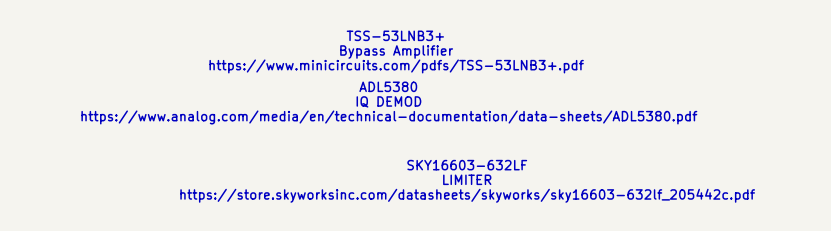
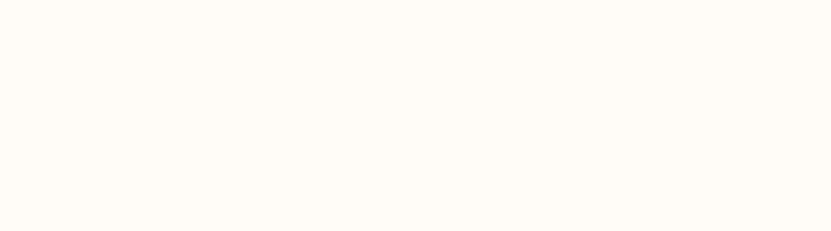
text: TSS-53LNB3+ (395, 35) -> none
text: Bypass Amplifier (396, 52) -> none
text: https://www.minicircuits.com/pdfs/TSS-53LNB3+.pdf (396, 66) -> none
text: ADL5380 (388, 86) -> none
text: IQ DEMOD (388, 101) -> none
text: https://www.analog.com/media/en/technical-documentation/data-sheets/ADL5380.pdf (389, 117) -> none
text: SKY16603-632LF (467, 165) -> none
text: LIMITER (467, 179) -> none
text: https://store.skyworksinc.com/datasheets/skyworks/sky16603-632lf_205442c.pdf (467, 195) -> none

